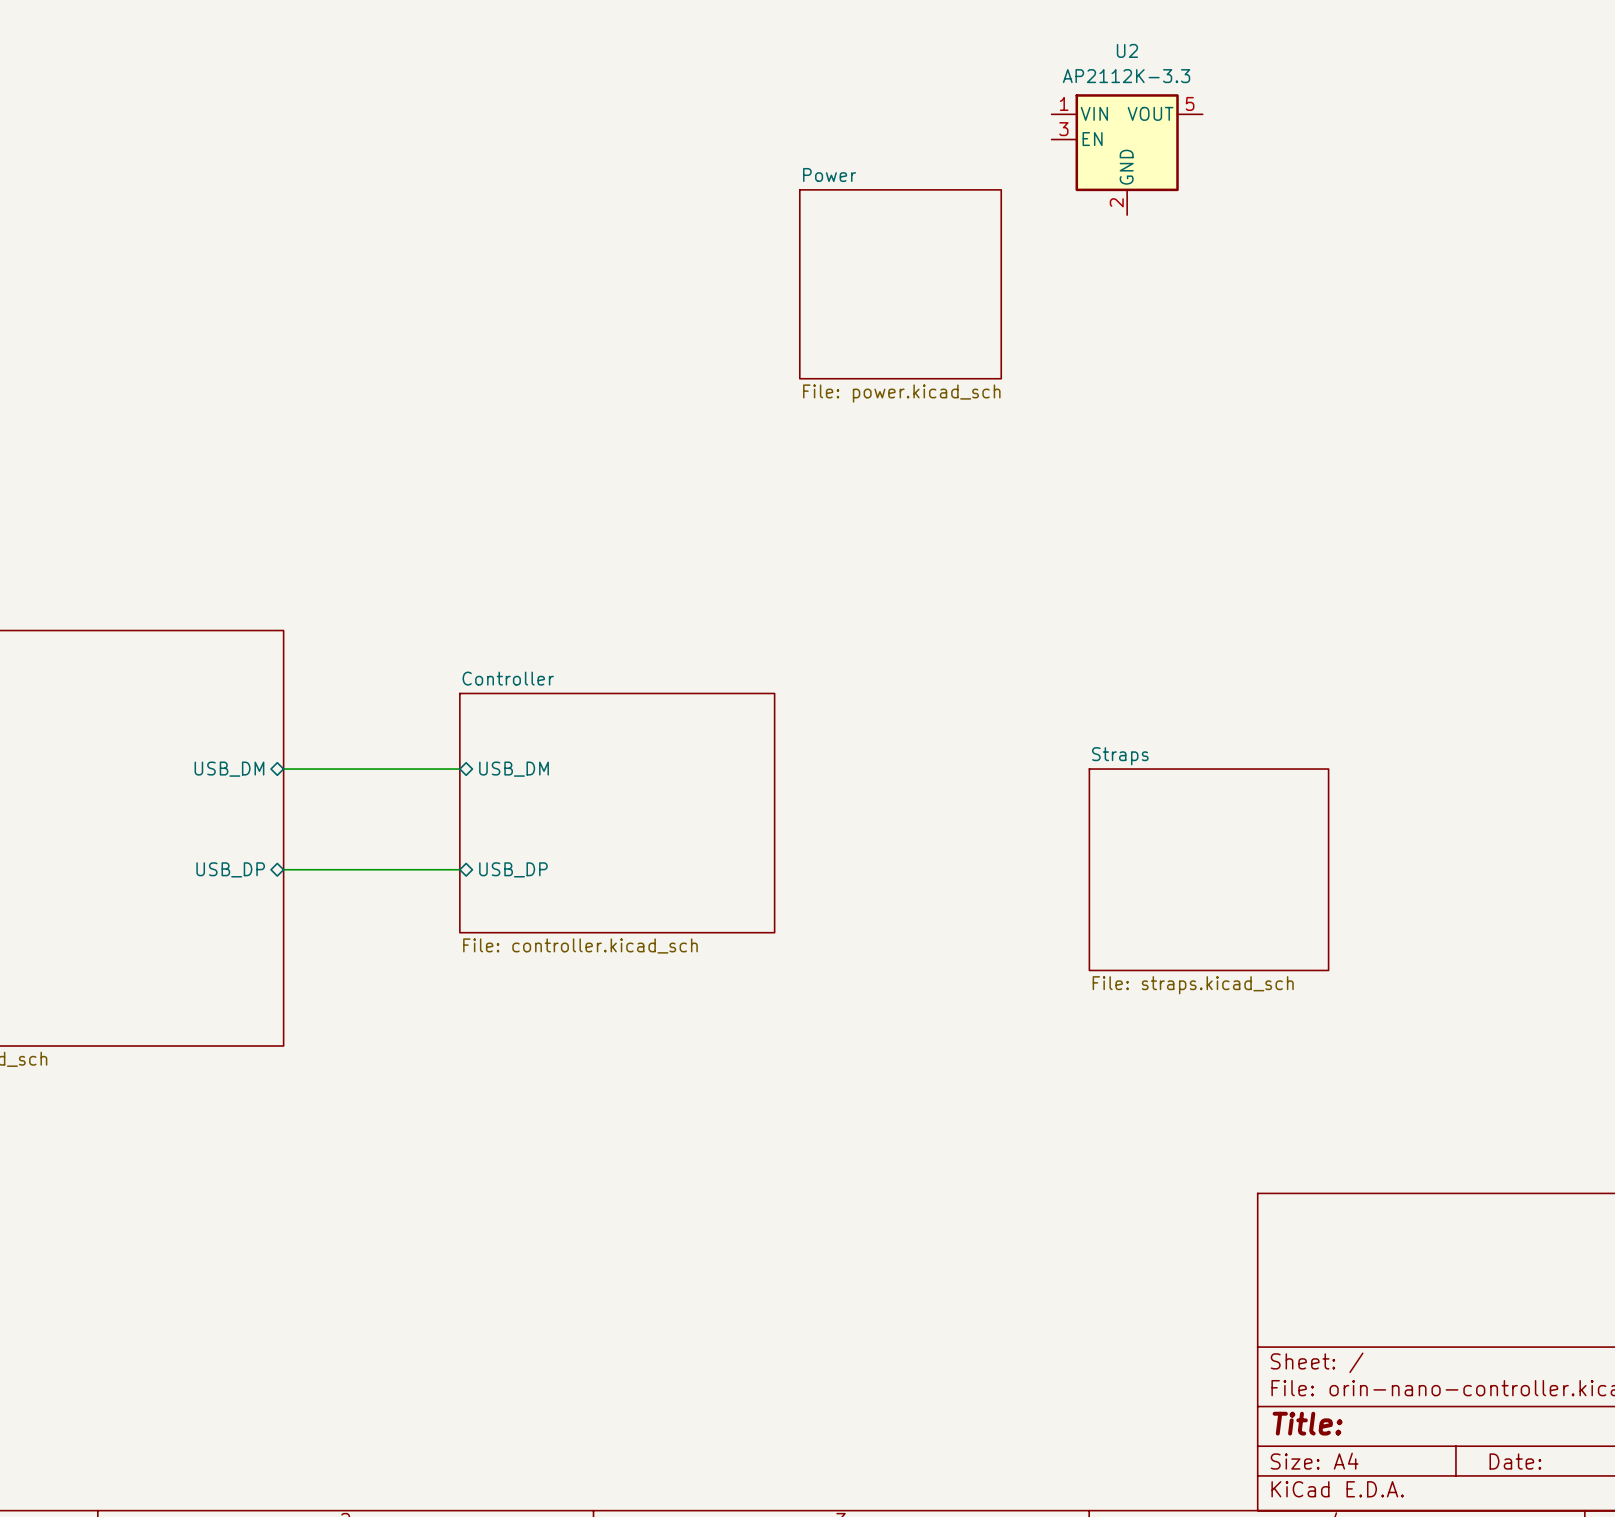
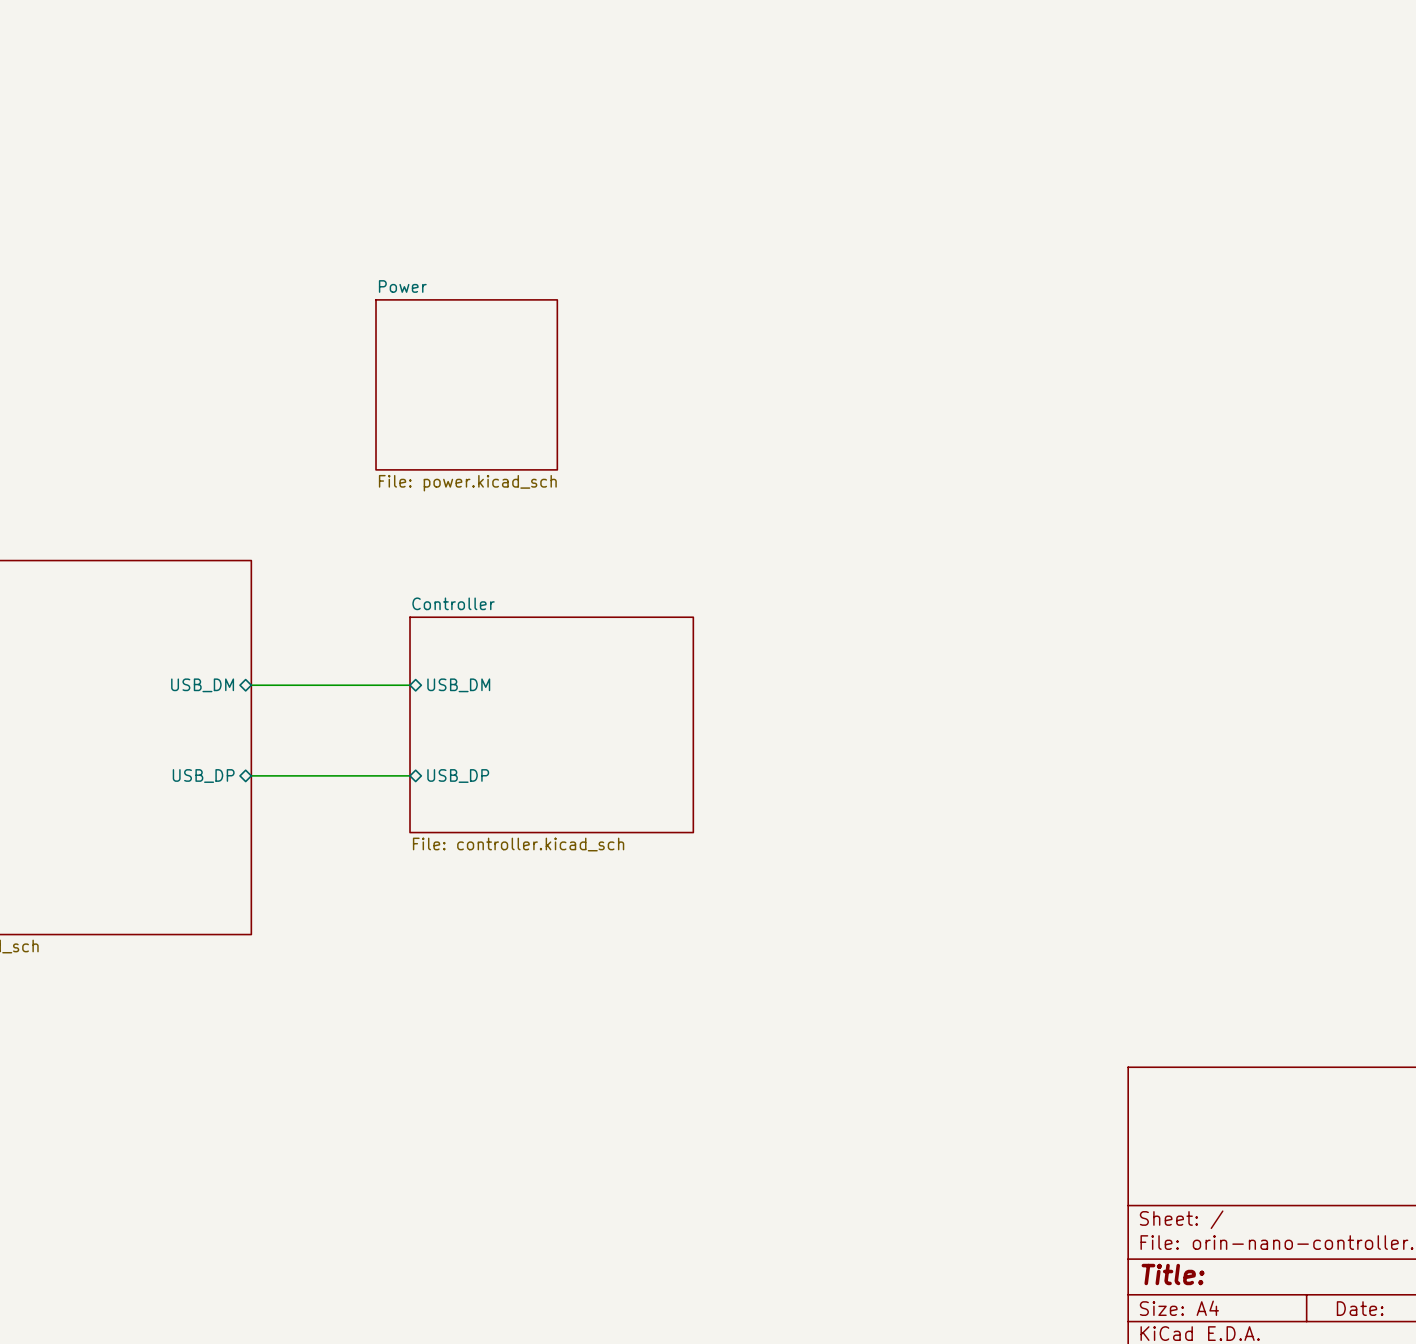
U2: AP2112K-3.3 (1127, 154) -> none
sheet Power: File: power.kicad_sch (900, 284) -> none
sheet Power: none -> File: power.kicad_sch (466, 384)
sheet Straps: File: straps.kicad_sch (1208, 869) -> none

